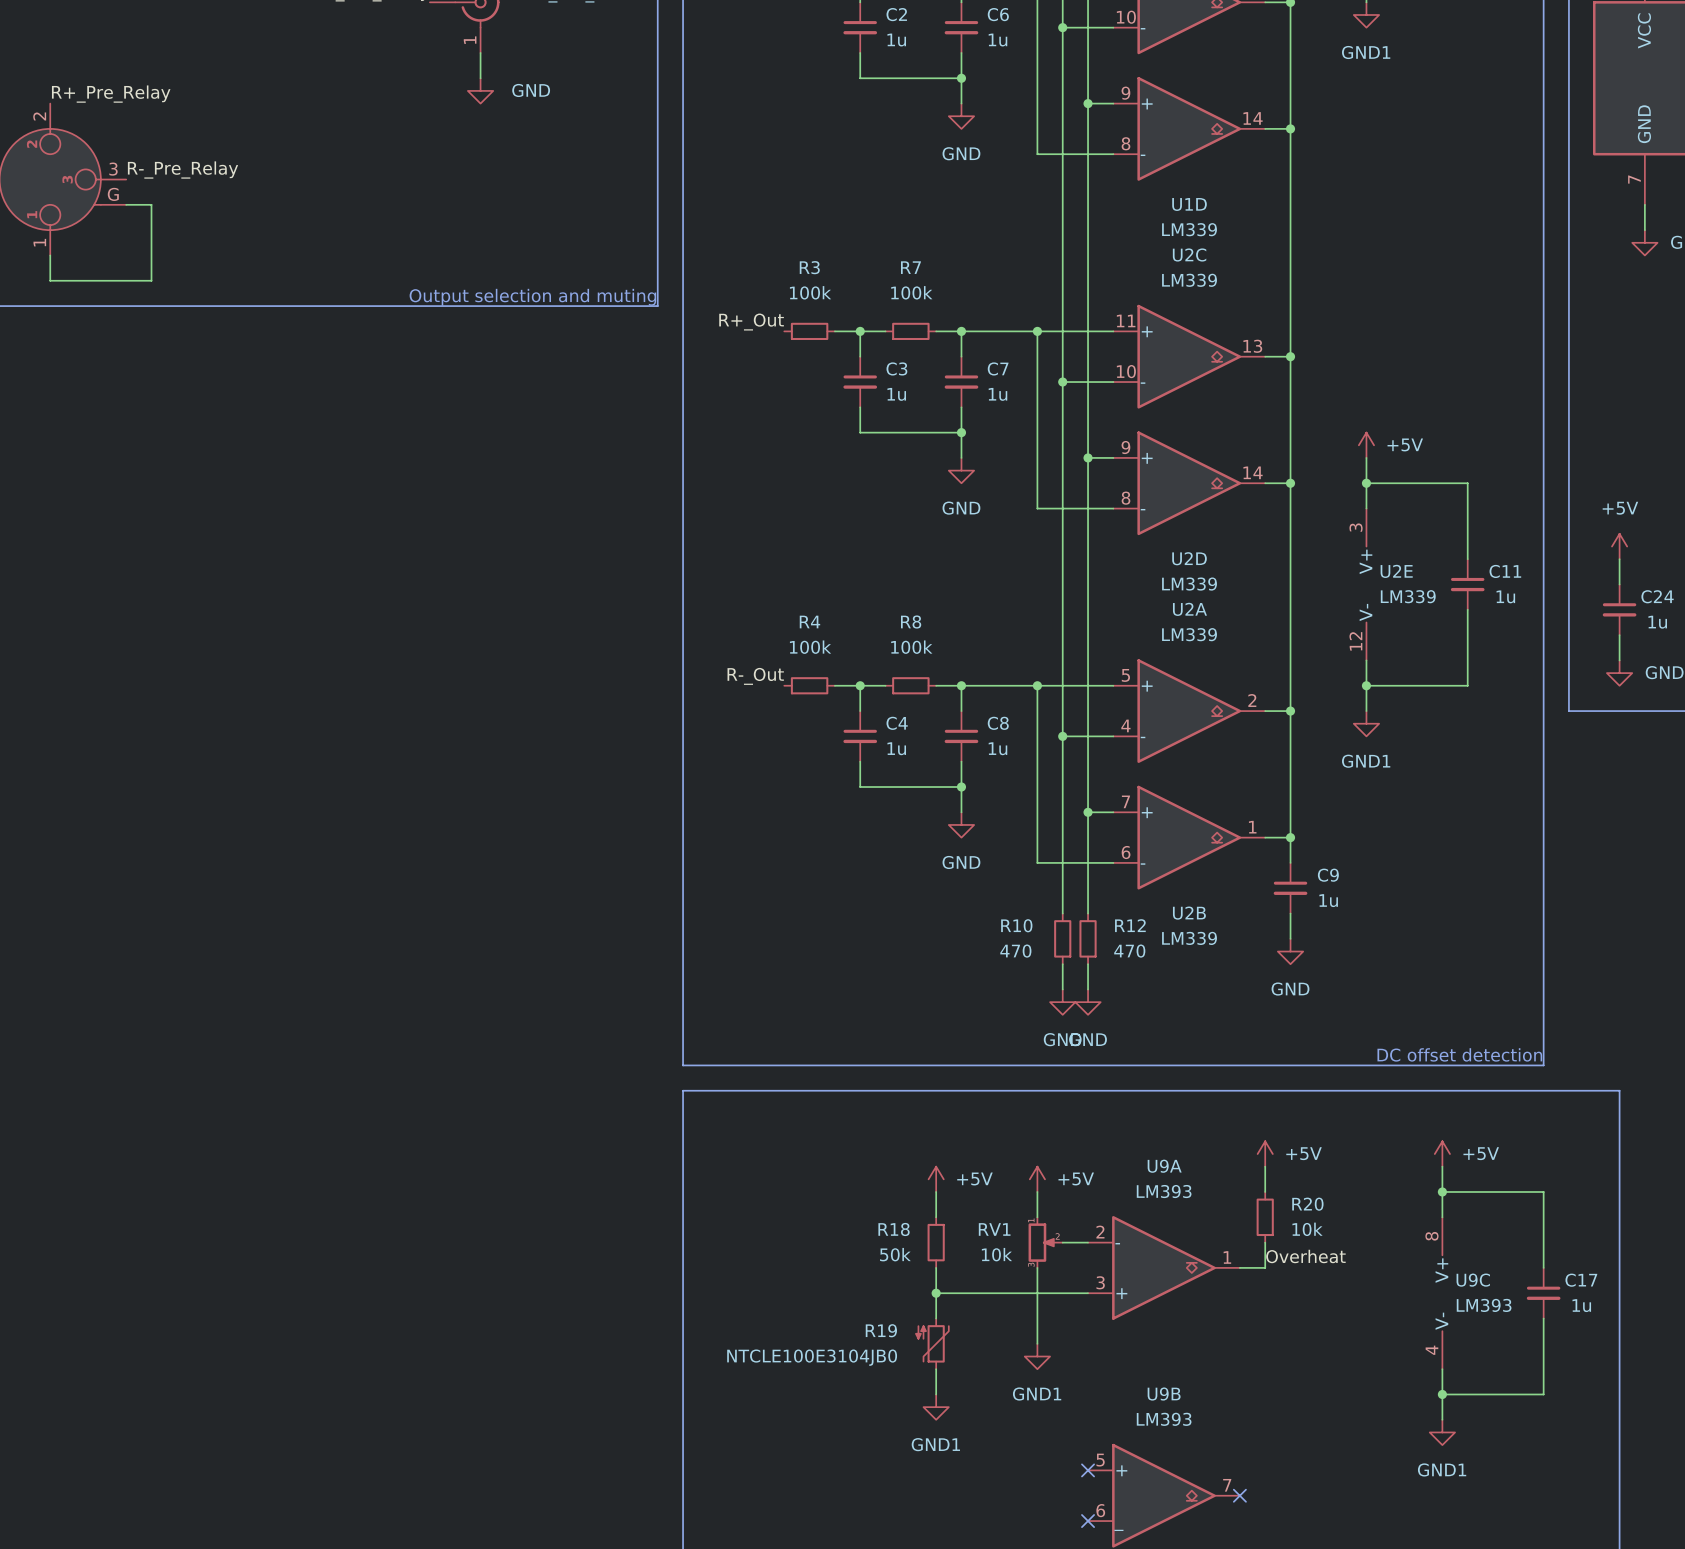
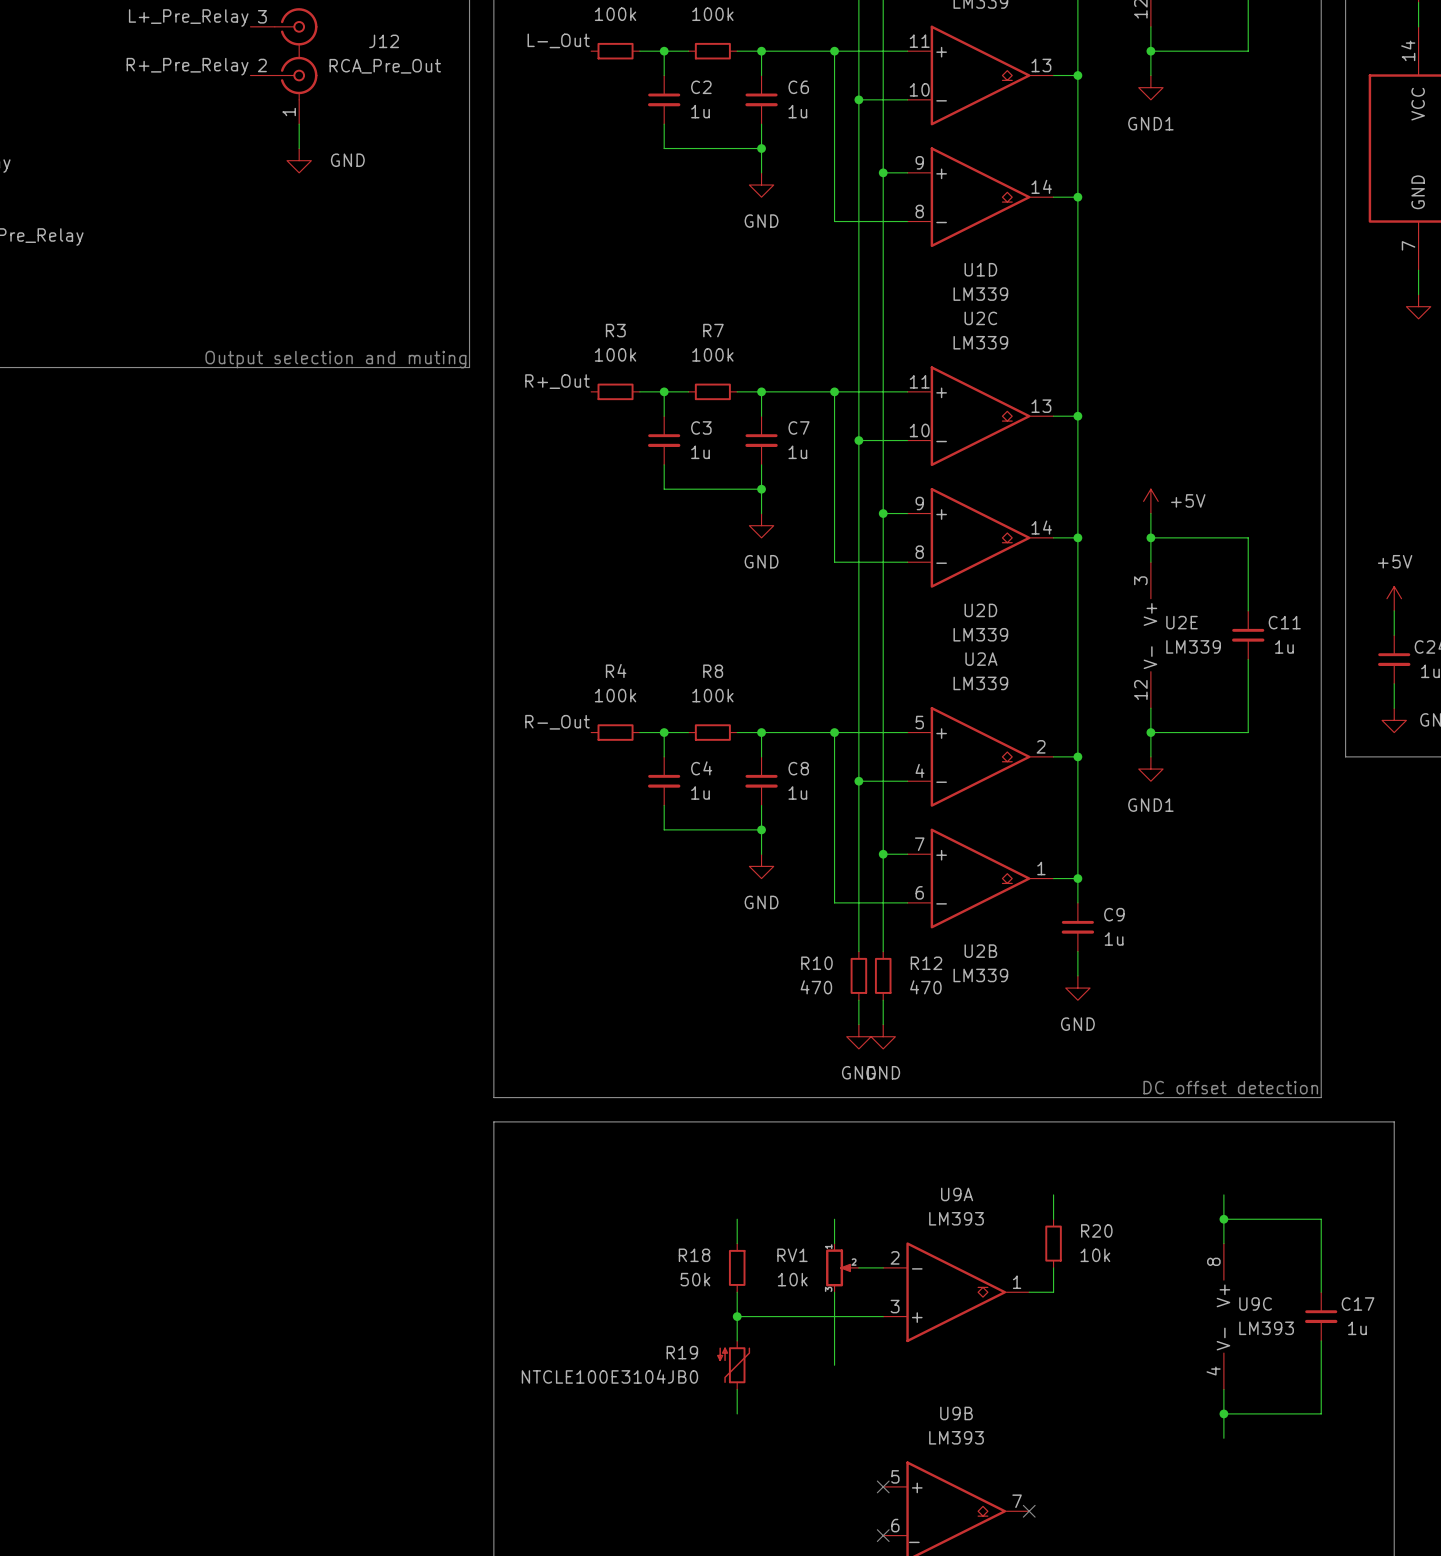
power symbol: +5V (1265, 1154) -> none
power symbol: +5V (1442, 1154) -> none
power symbol: +5V (936, 1179) -> none
power symbol: +5V (1037, 1179) -> none
label: Overheat (1305, 1256) -> none
power symbol: GND1 (1037, 1356) -> none
power symbol: GND1 (936, 1407) -> none
power symbol: GND1 (1442, 1432) -> none

